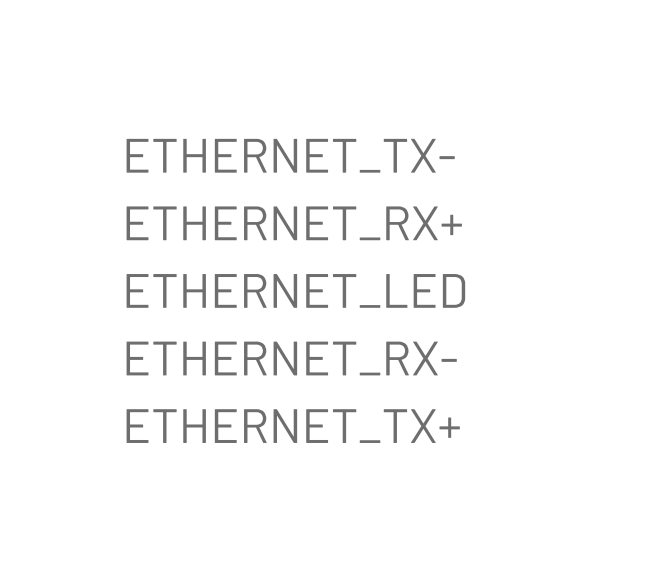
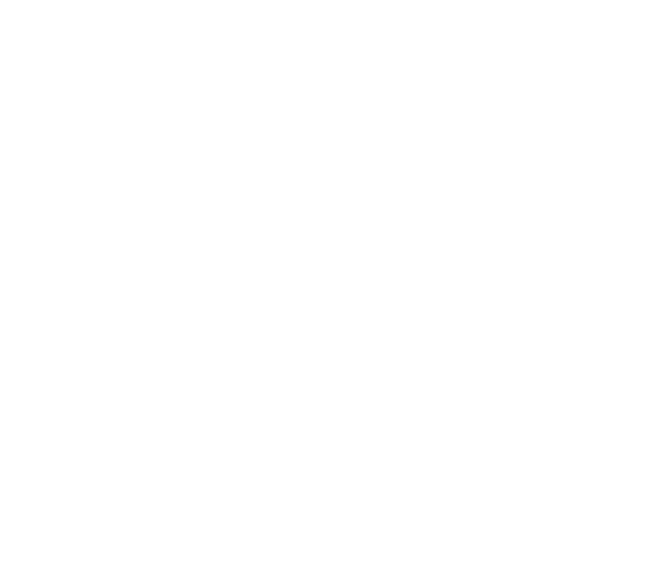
label: ETHERNET_TX- (290, 155) -> none
label: ETHERNET_RX+ (294, 223) -> none
label: ETHERNET_LED (295, 290) -> none
label: ETHERNET_RX- (291, 358) -> none
label: ETHERNET_TX+ (293, 426) -> none

